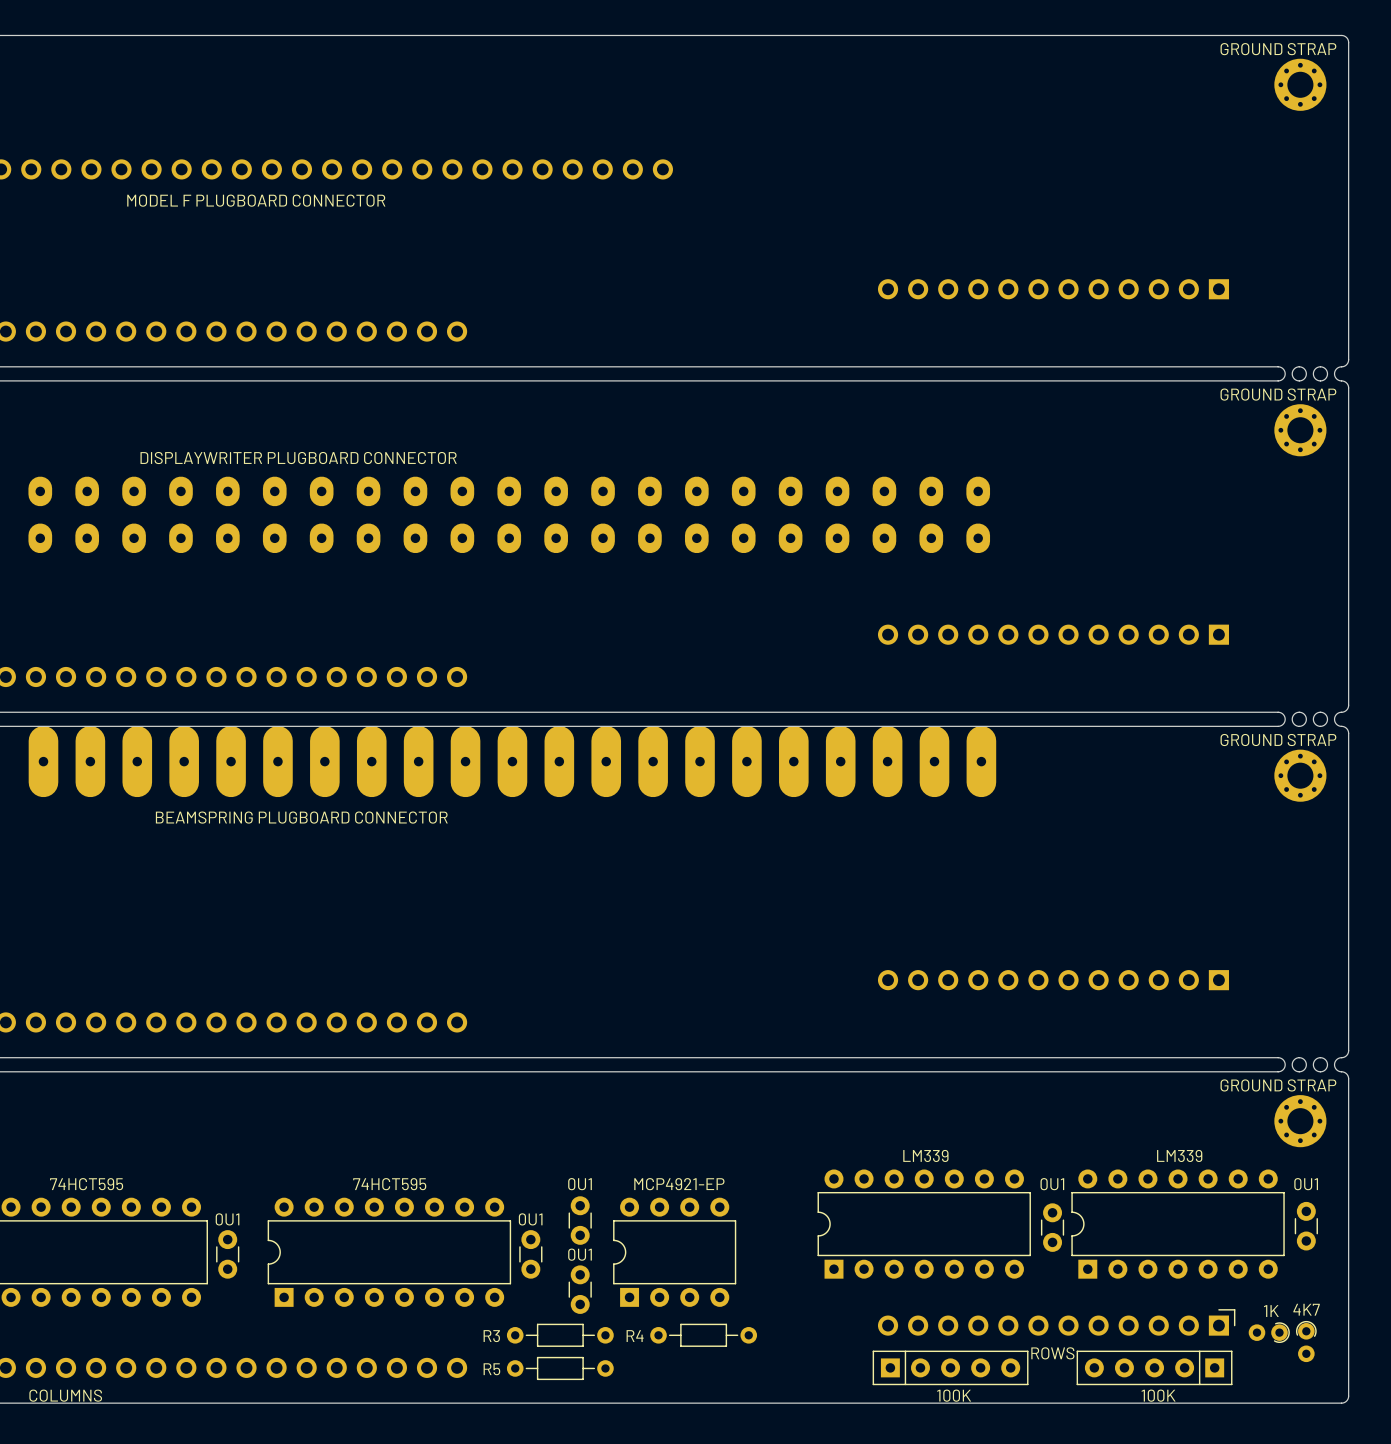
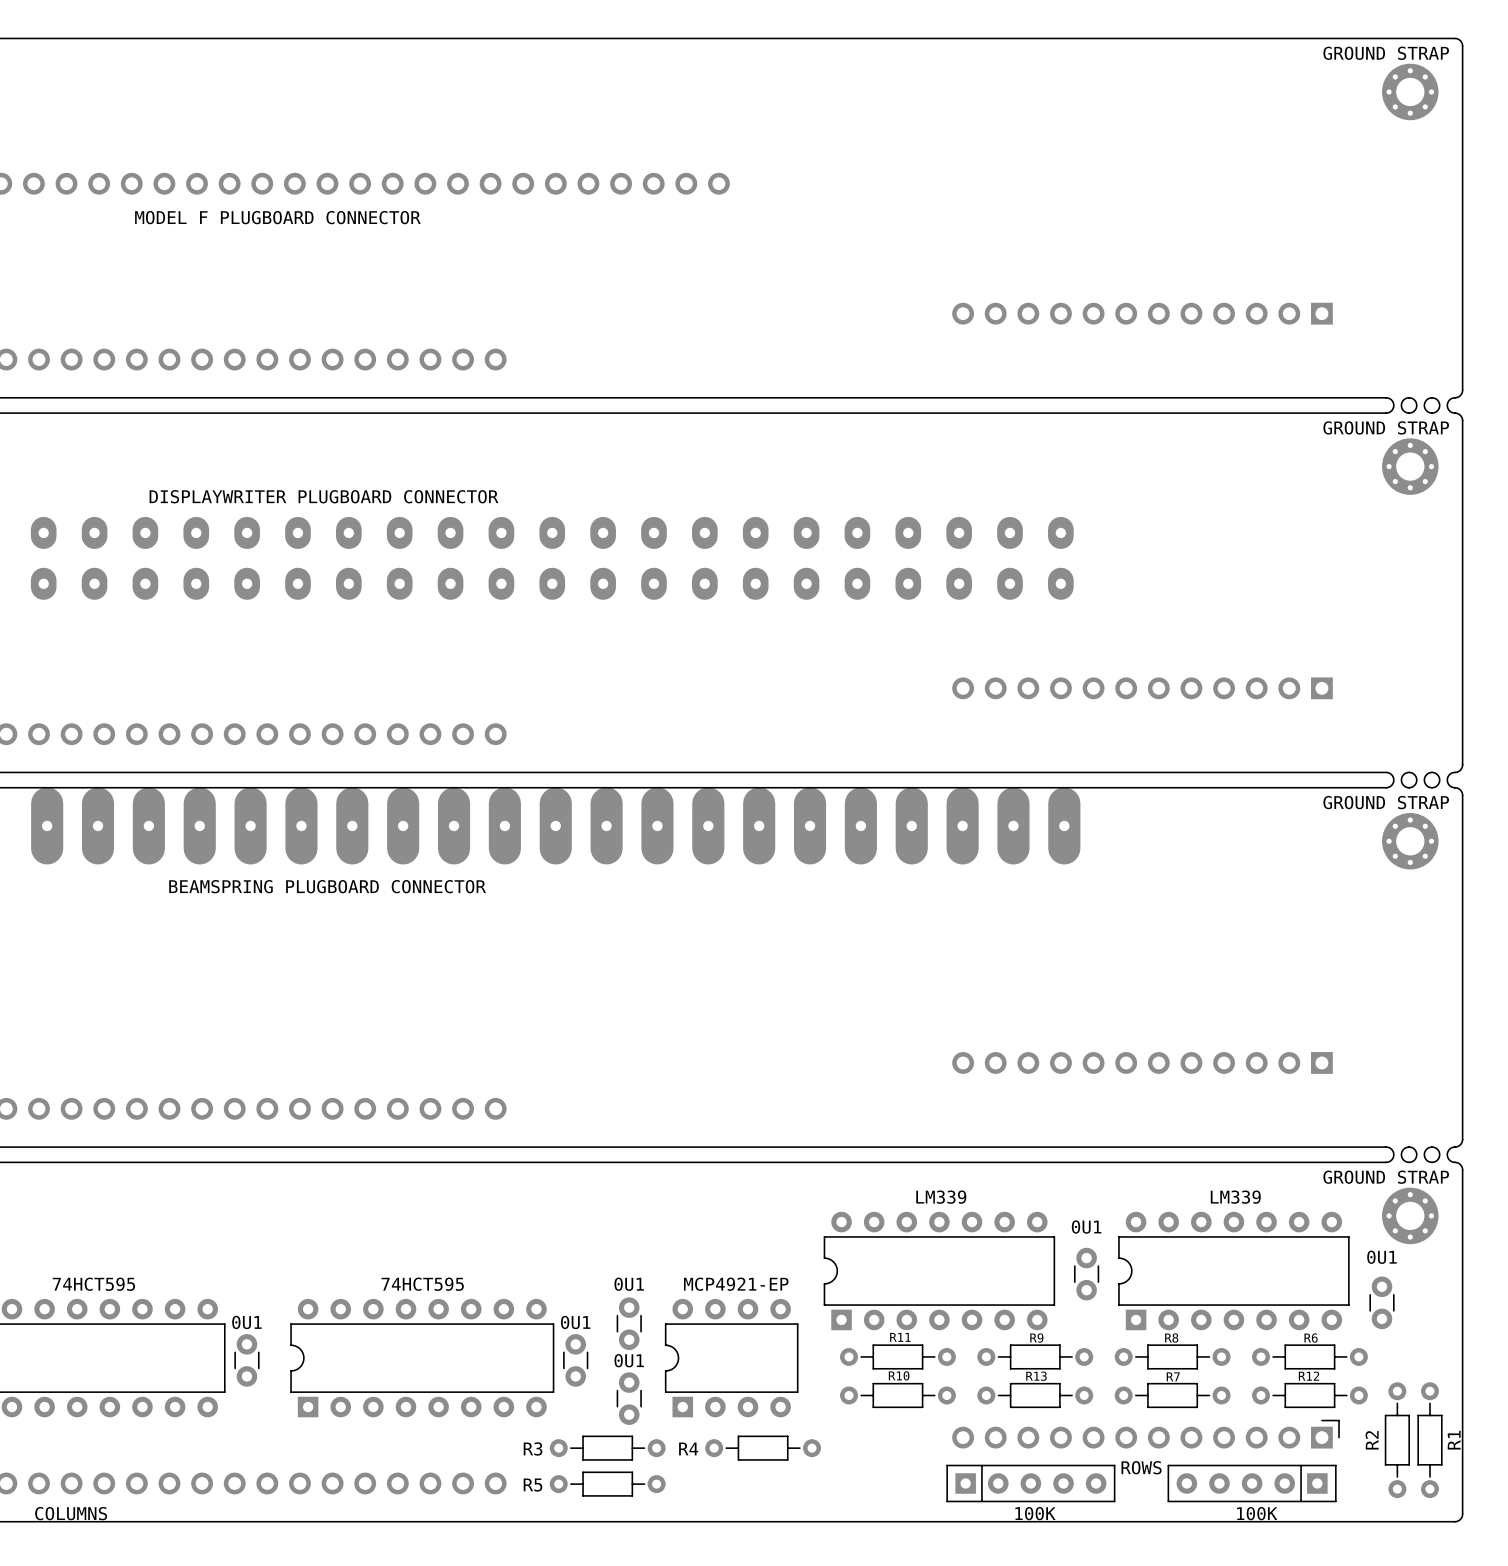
part position: (924, 1224) -> (939, 1271)
part position: (1178, 1224) -> (1233, 1271)
part position: (1306, 1226) -> (1382, 1302)
part position: (1052, 1227) -> (1086, 1274)
R11: none -> (897, 1356)
R9: none -> (1035, 1356)
R8: none -> (1172, 1356)
R6: none -> (1309, 1356)
R10: none -> (897, 1395)
R13: none -> (1035, 1395)
R7: none -> (1172, 1395)
R12: none -> (1309, 1395)
R2: none -> (1397, 1440)
R1: none -> (1429, 1440)
part: 1K (1269, 1332) -> none
part: 4K7 (1306, 1341) -> none

